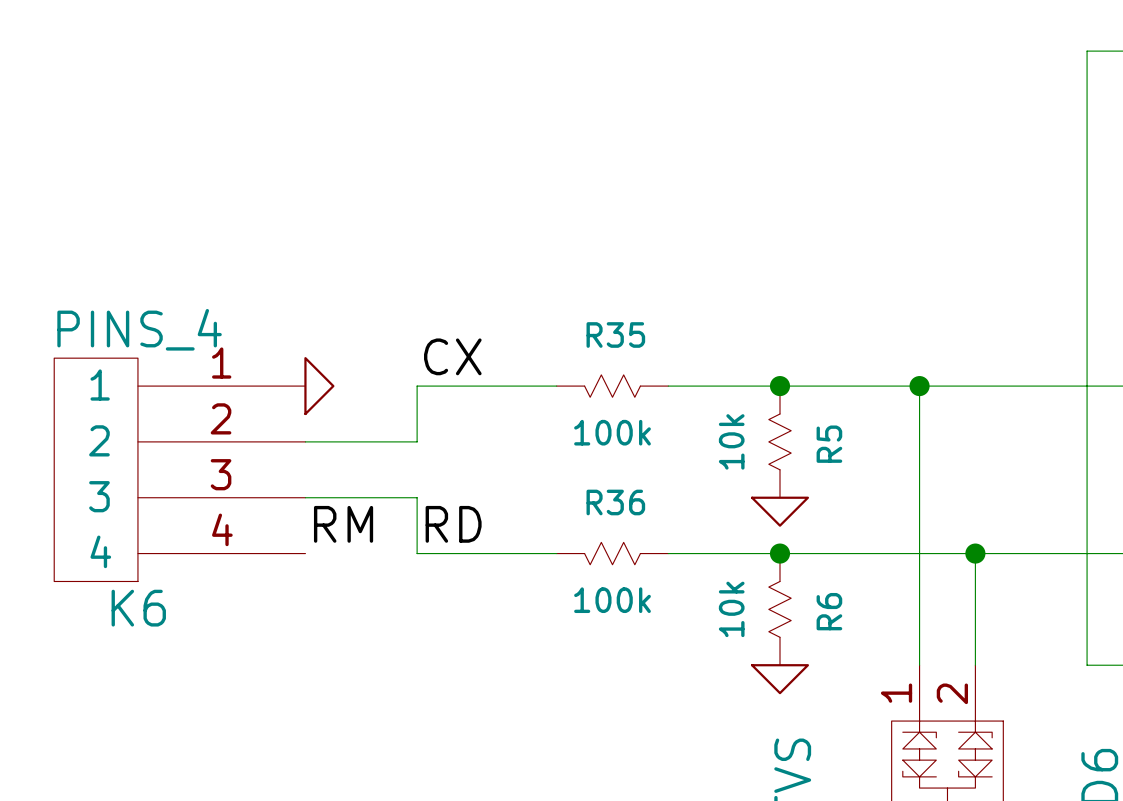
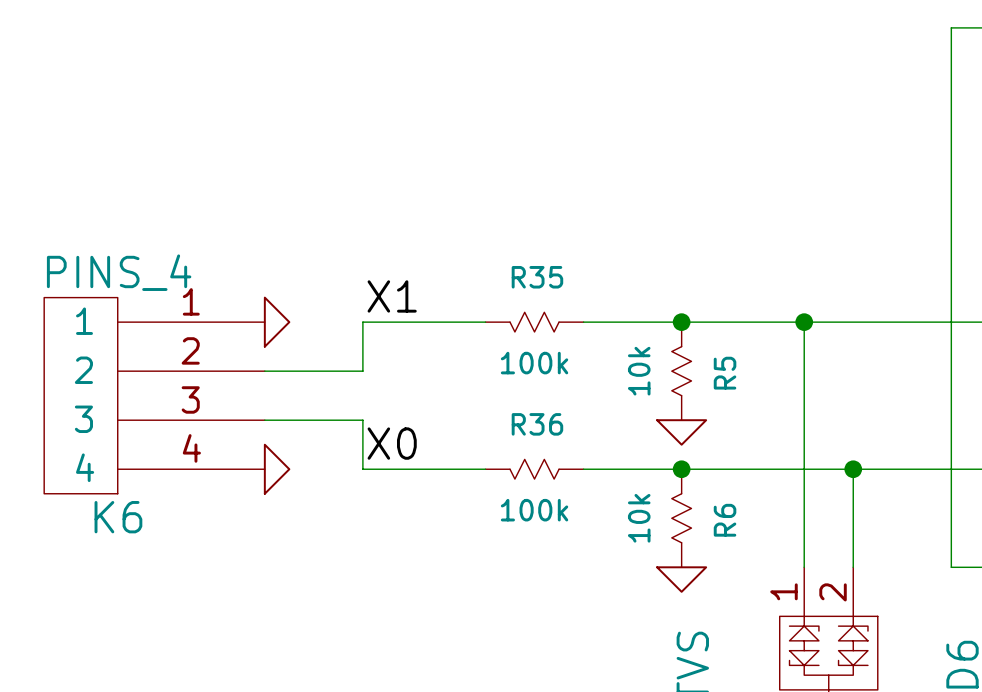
label: CX (452, 356) -> X1 (392, 296)
label: RM (343, 524) -> none
label: RD (453, 524) -> X0 (392, 443)
power symbol: none -> (277, 469)

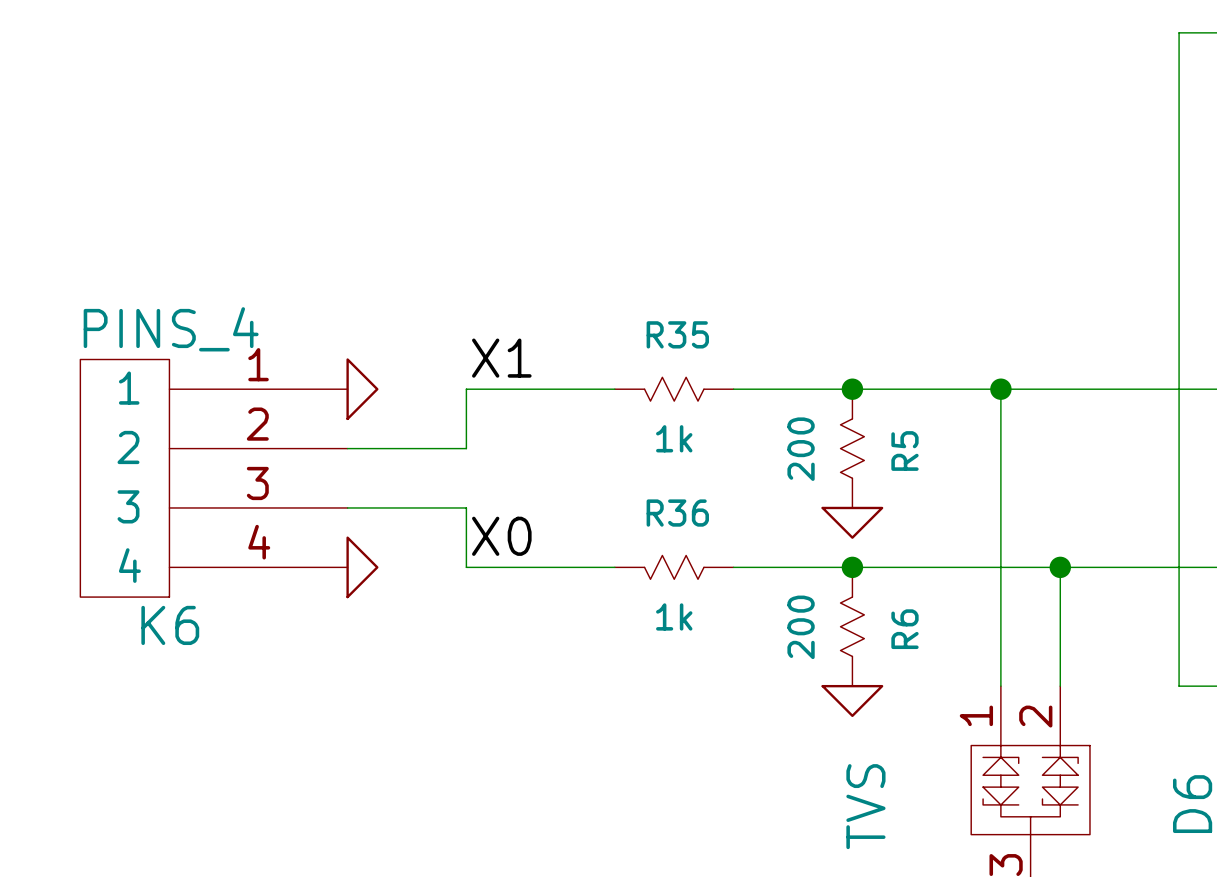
R35 value: 100k (534, 363) -> 1k (674, 438)
R5 value: 10k (639, 371) -> 200 (801, 449)
R36 value: 100k (534, 510) -> 1k (674, 616)
R6 value: 10k (639, 518) -> 200 (801, 627)

